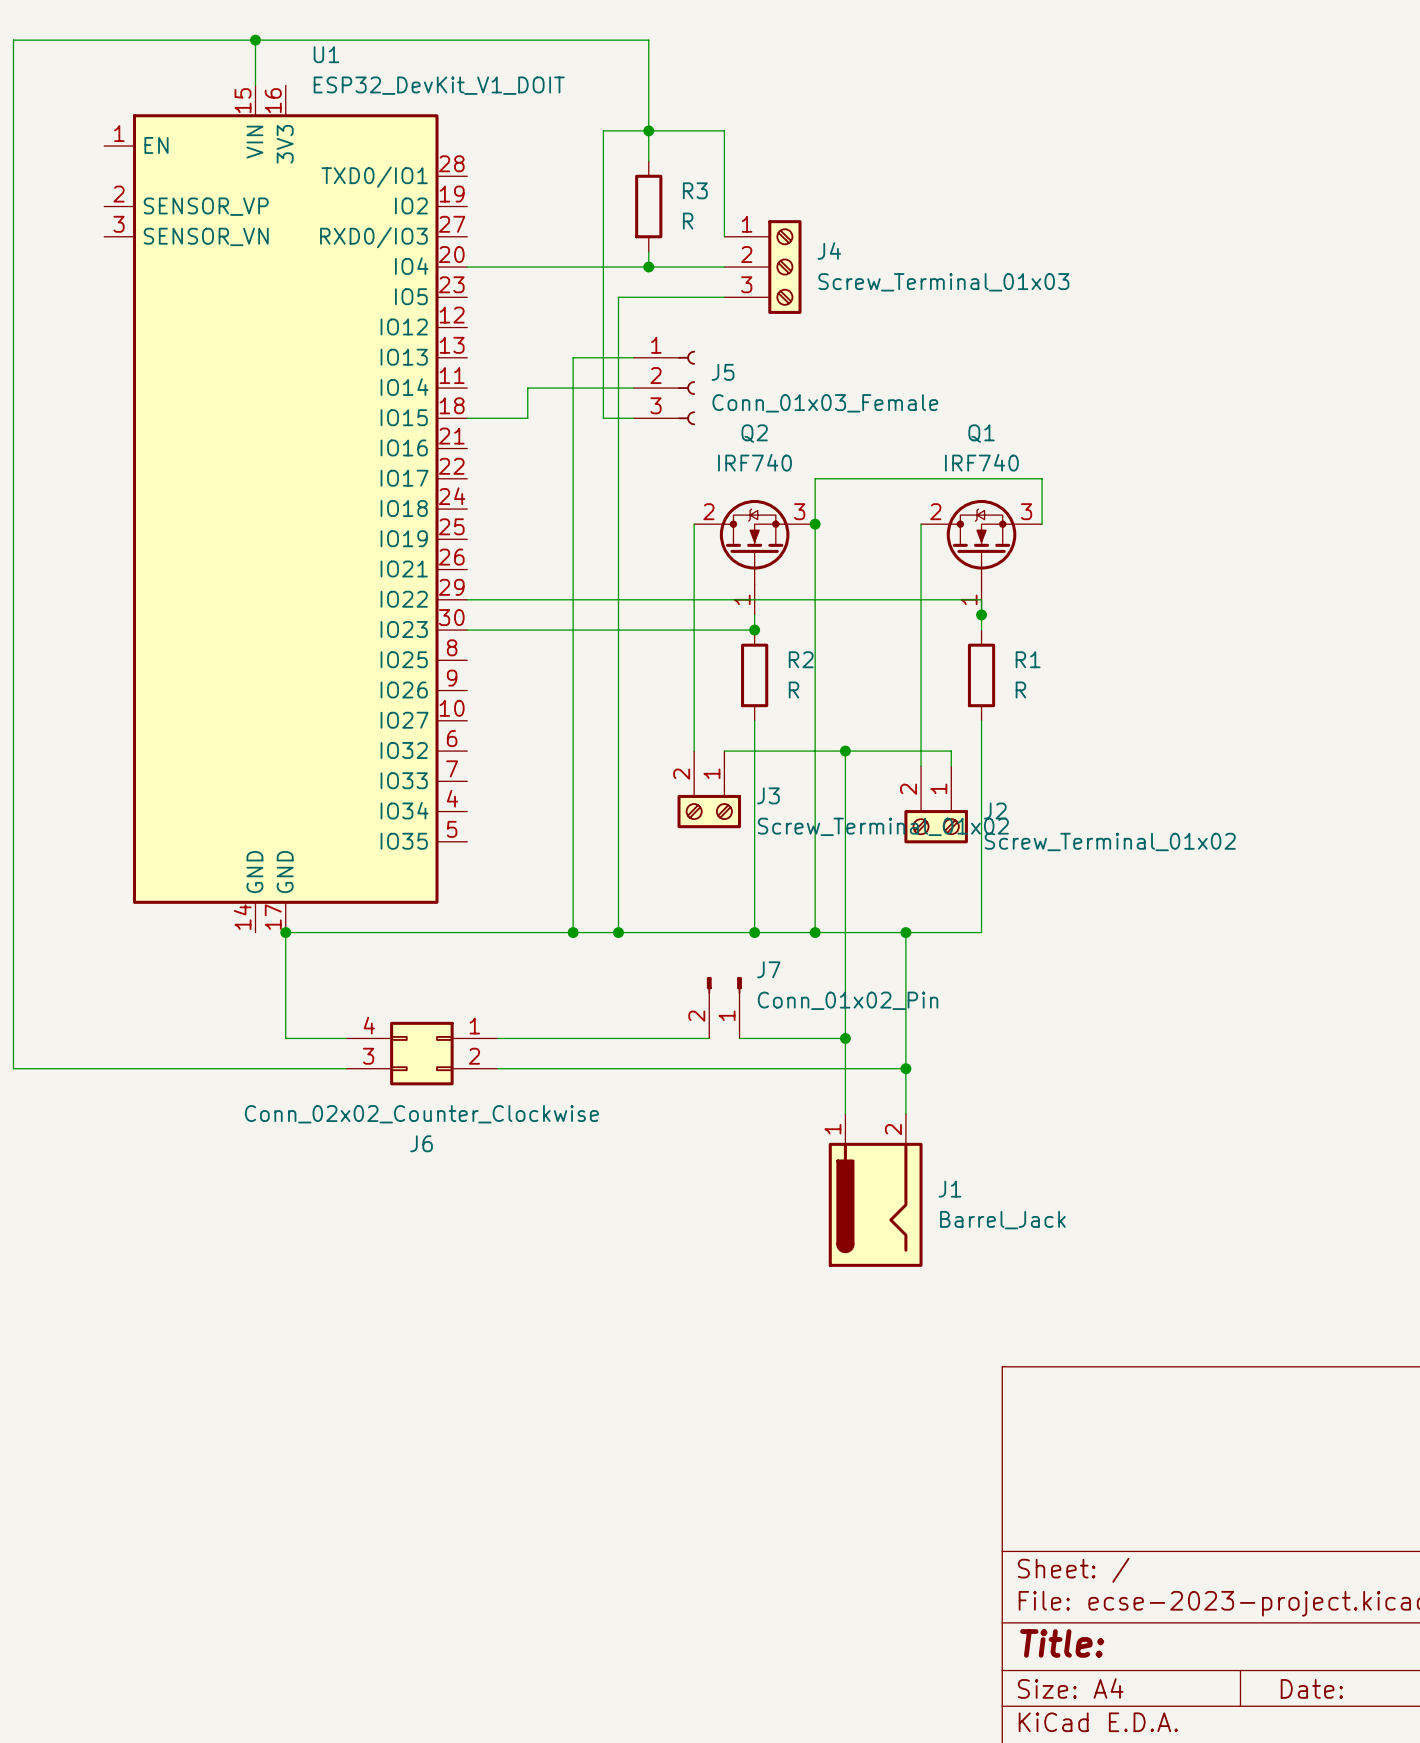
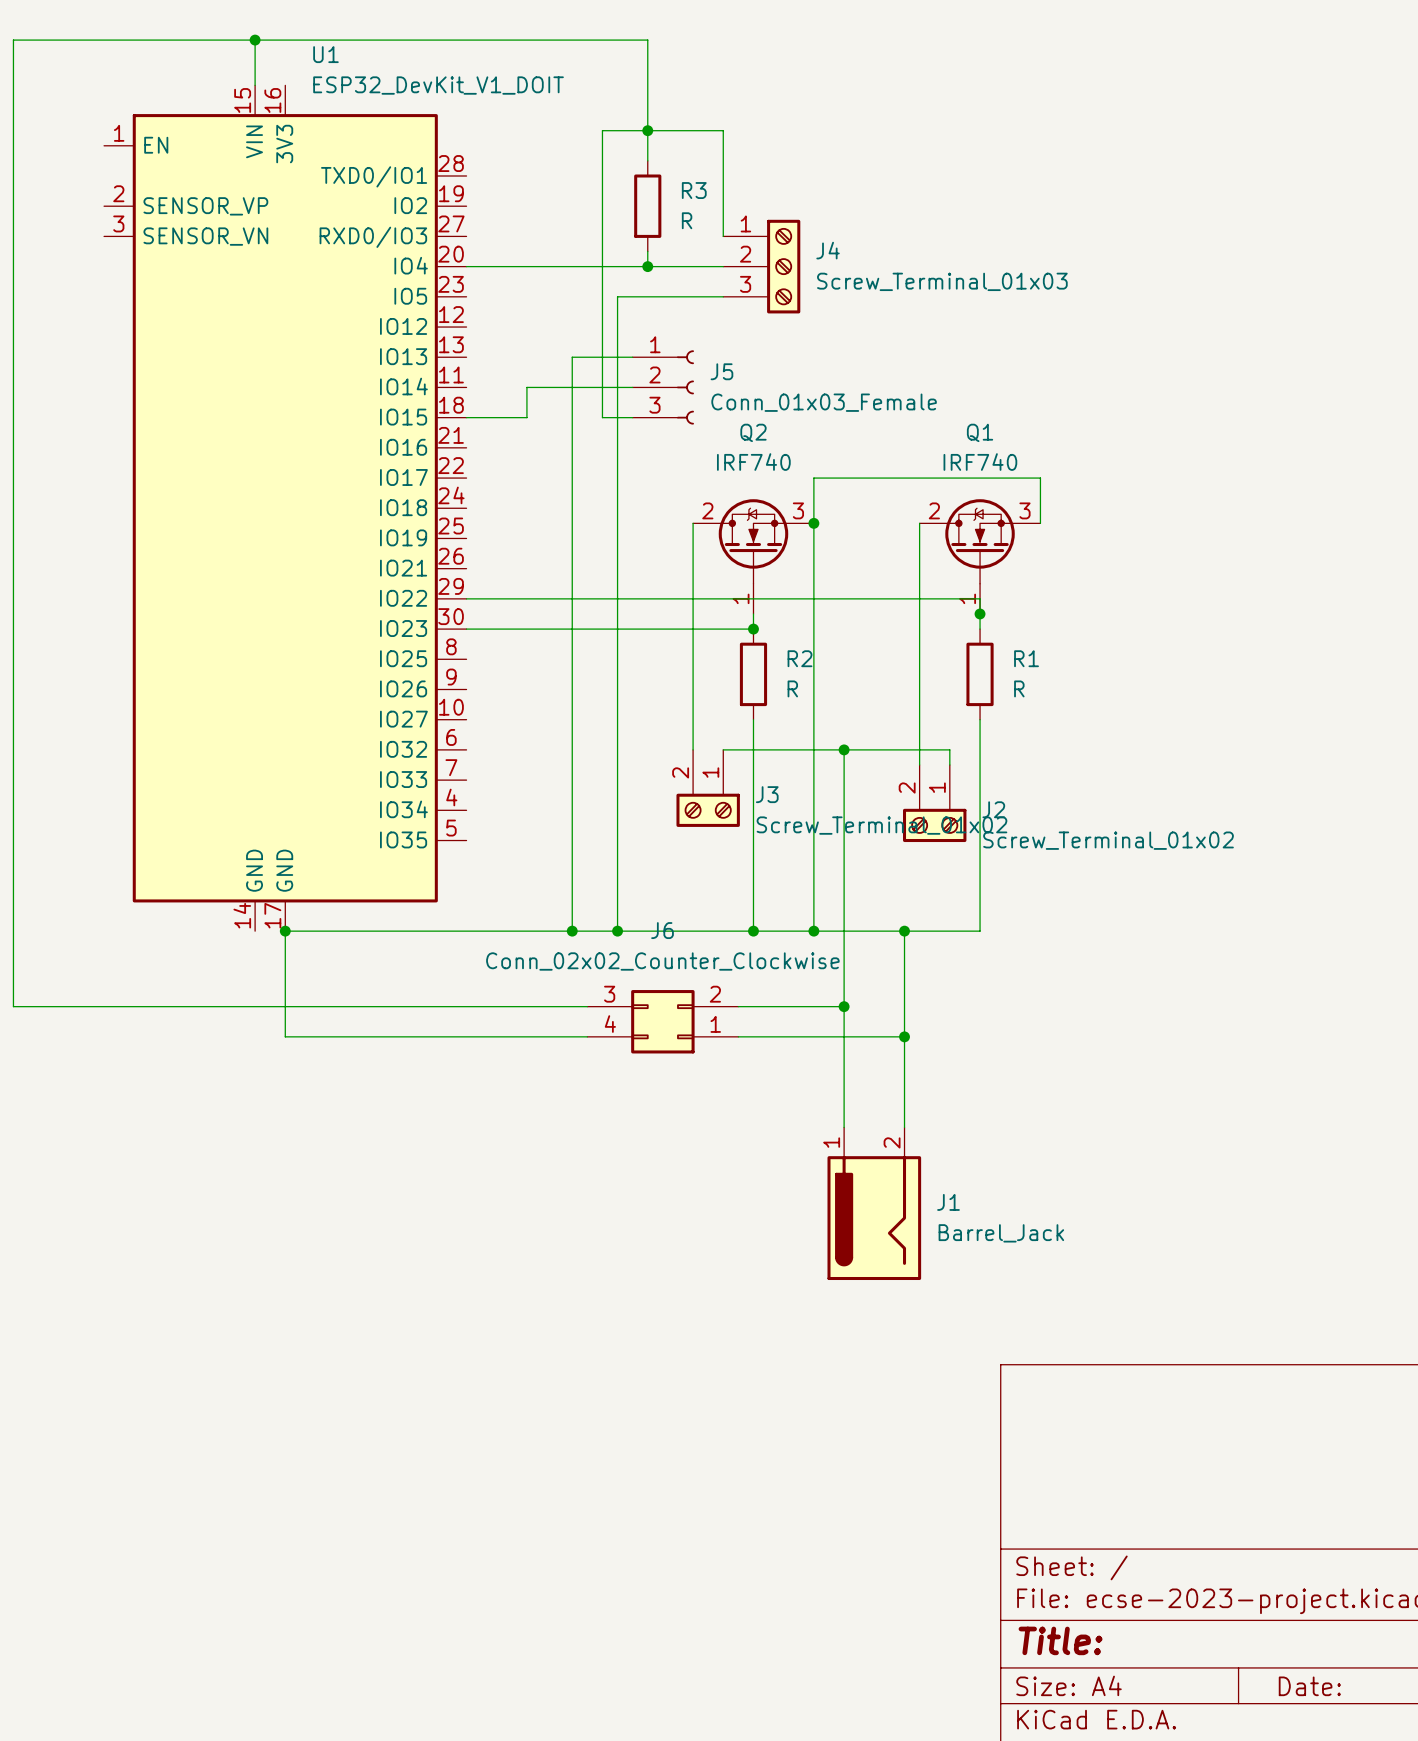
J7: Conn_01x02_Pin (724, 1007) -> none
wire: (13, 1008) (13, 1068) (346, 1068) -> (13, 1006) (587, 1006)
wire: none -> (738, 1006) (844, 1006)
junction: none -> (844, 1006)
wire: none -> (844, 1036) (904, 1036)
junction: (845, 1038) -> none
junction: none -> (904, 1036)
J6 flip: as is (421, 1053) -> up-down (662, 1021)
J6 position: (421, 1053) -> (662, 1021)
wire: (497, 1068) (905, 1068) -> none
junction: (905, 1068) -> none
J1 position: (875, 1190) -> (874, 1203)

